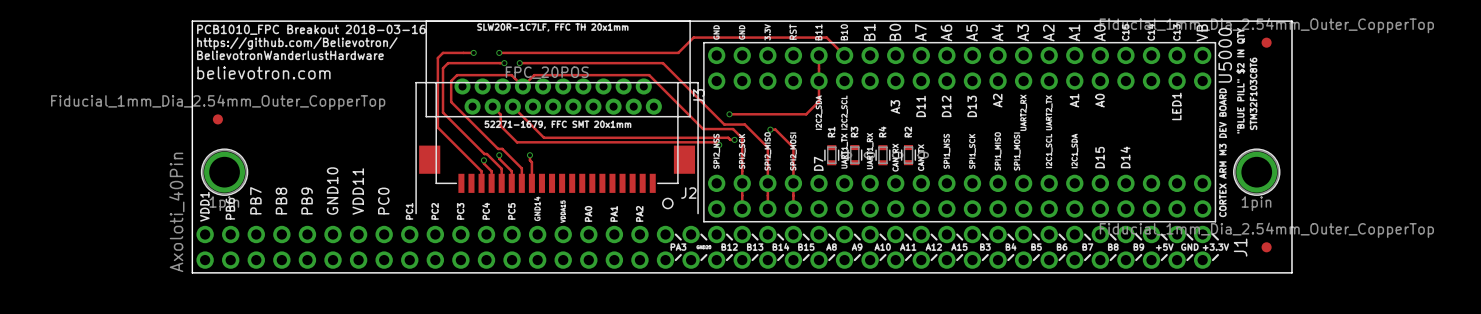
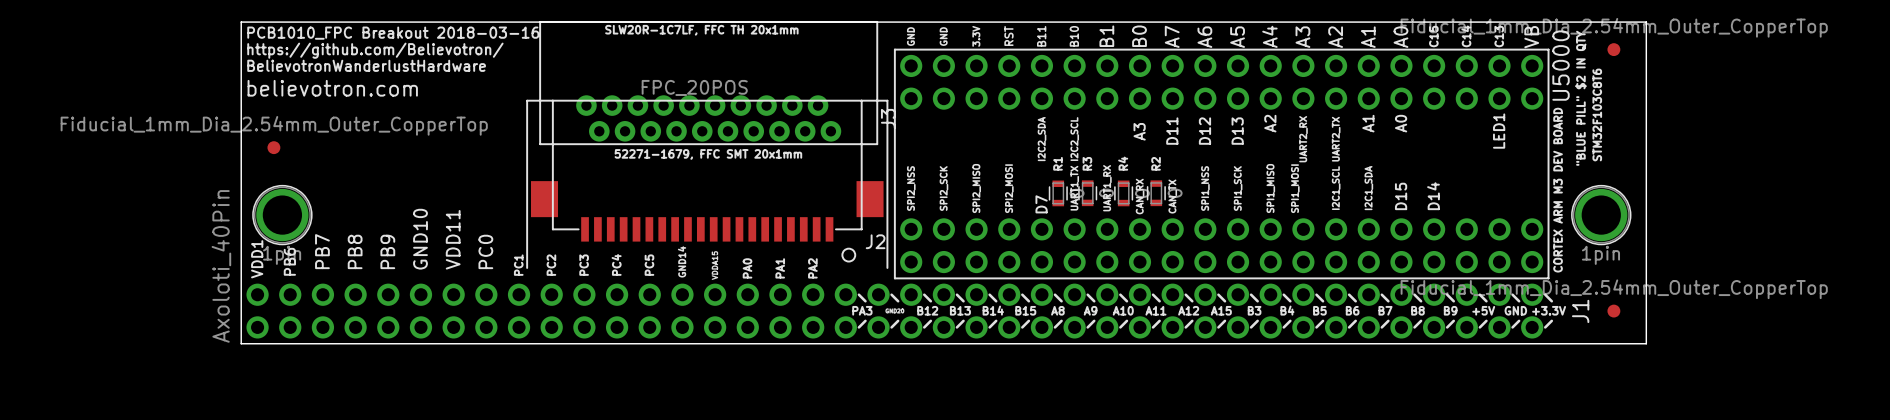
track: (473, 52) (443, 52) (437, 58) (437, 127) (481, 171) (481, 183) -> none
via: (473, 52) -> none
track: (499, 52) (678, 52) (693, 37) (826, 37) (844, 55) -> none
via: (499, 52) -> none
track: (818, 55) (818, 101) (806, 114) (729, 114) -> none
track: (504, 63) (448, 63) (443, 68) (443, 112) (501, 168) (501, 183) -> none
via: (504, 63) -> none
track: (519, 63) (662, 63) (724, 124) (744, 124) (767, 147) (767, 208) -> none
via: (519, 63) -> none
track: (492, 106) (500, 114) (500, 126) (517, 142) (716, 142) (719, 144) -> none
track: (512, 106) (544, 137) (728, 137) (734, 139) -> none
via: (729, 114) -> none
track: (770, 129) (775, 129) (793, 147) (793, 208) -> none
via: (770, 129) -> none
via: (734, 139) -> none
via: (719, 144) -> none
track: (499, 155) (499, 158) (511, 171) (511, 183) -> none
via: (499, 155) -> none
track: (529, 155) (531, 183) -> none
via: (529, 155) -> none
track: (483, 160) (483, 163) (491, 171) (491, 183) -> none
via: (483, 160) -> none
track: (521, 183) (521, 168) (502, 148) (498, 148) (451, 101) (451, 81) (457, 75) (511, 75) (522, 86) (534, 75) (649, 75) (703, 129) (733, 129) (742, 138) (742, 208) -> none

